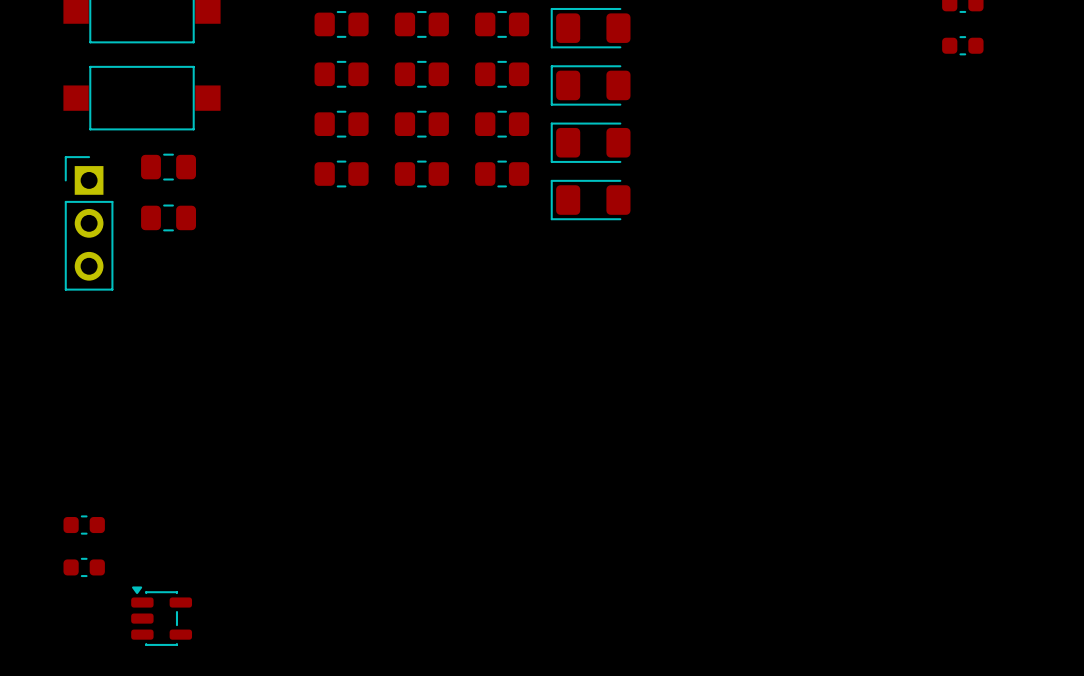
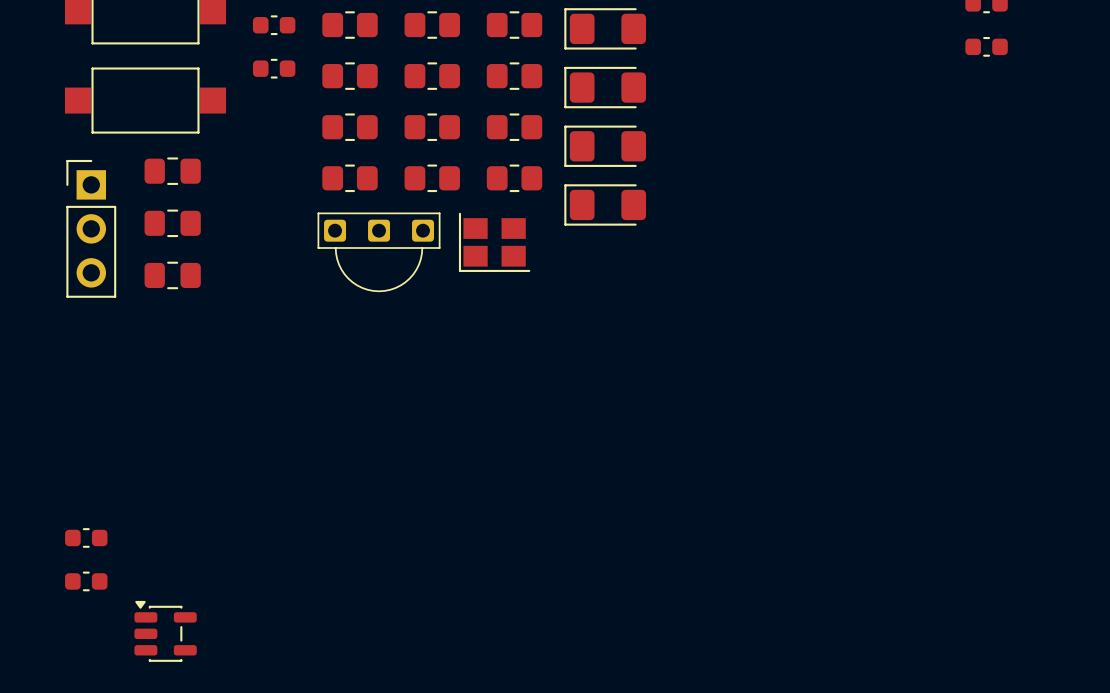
part: none -> (274, 25)
part: none -> (274, 68)
part: none -> (494, 242)
part: none -> (379, 252)
part: none -> (172, 275)

